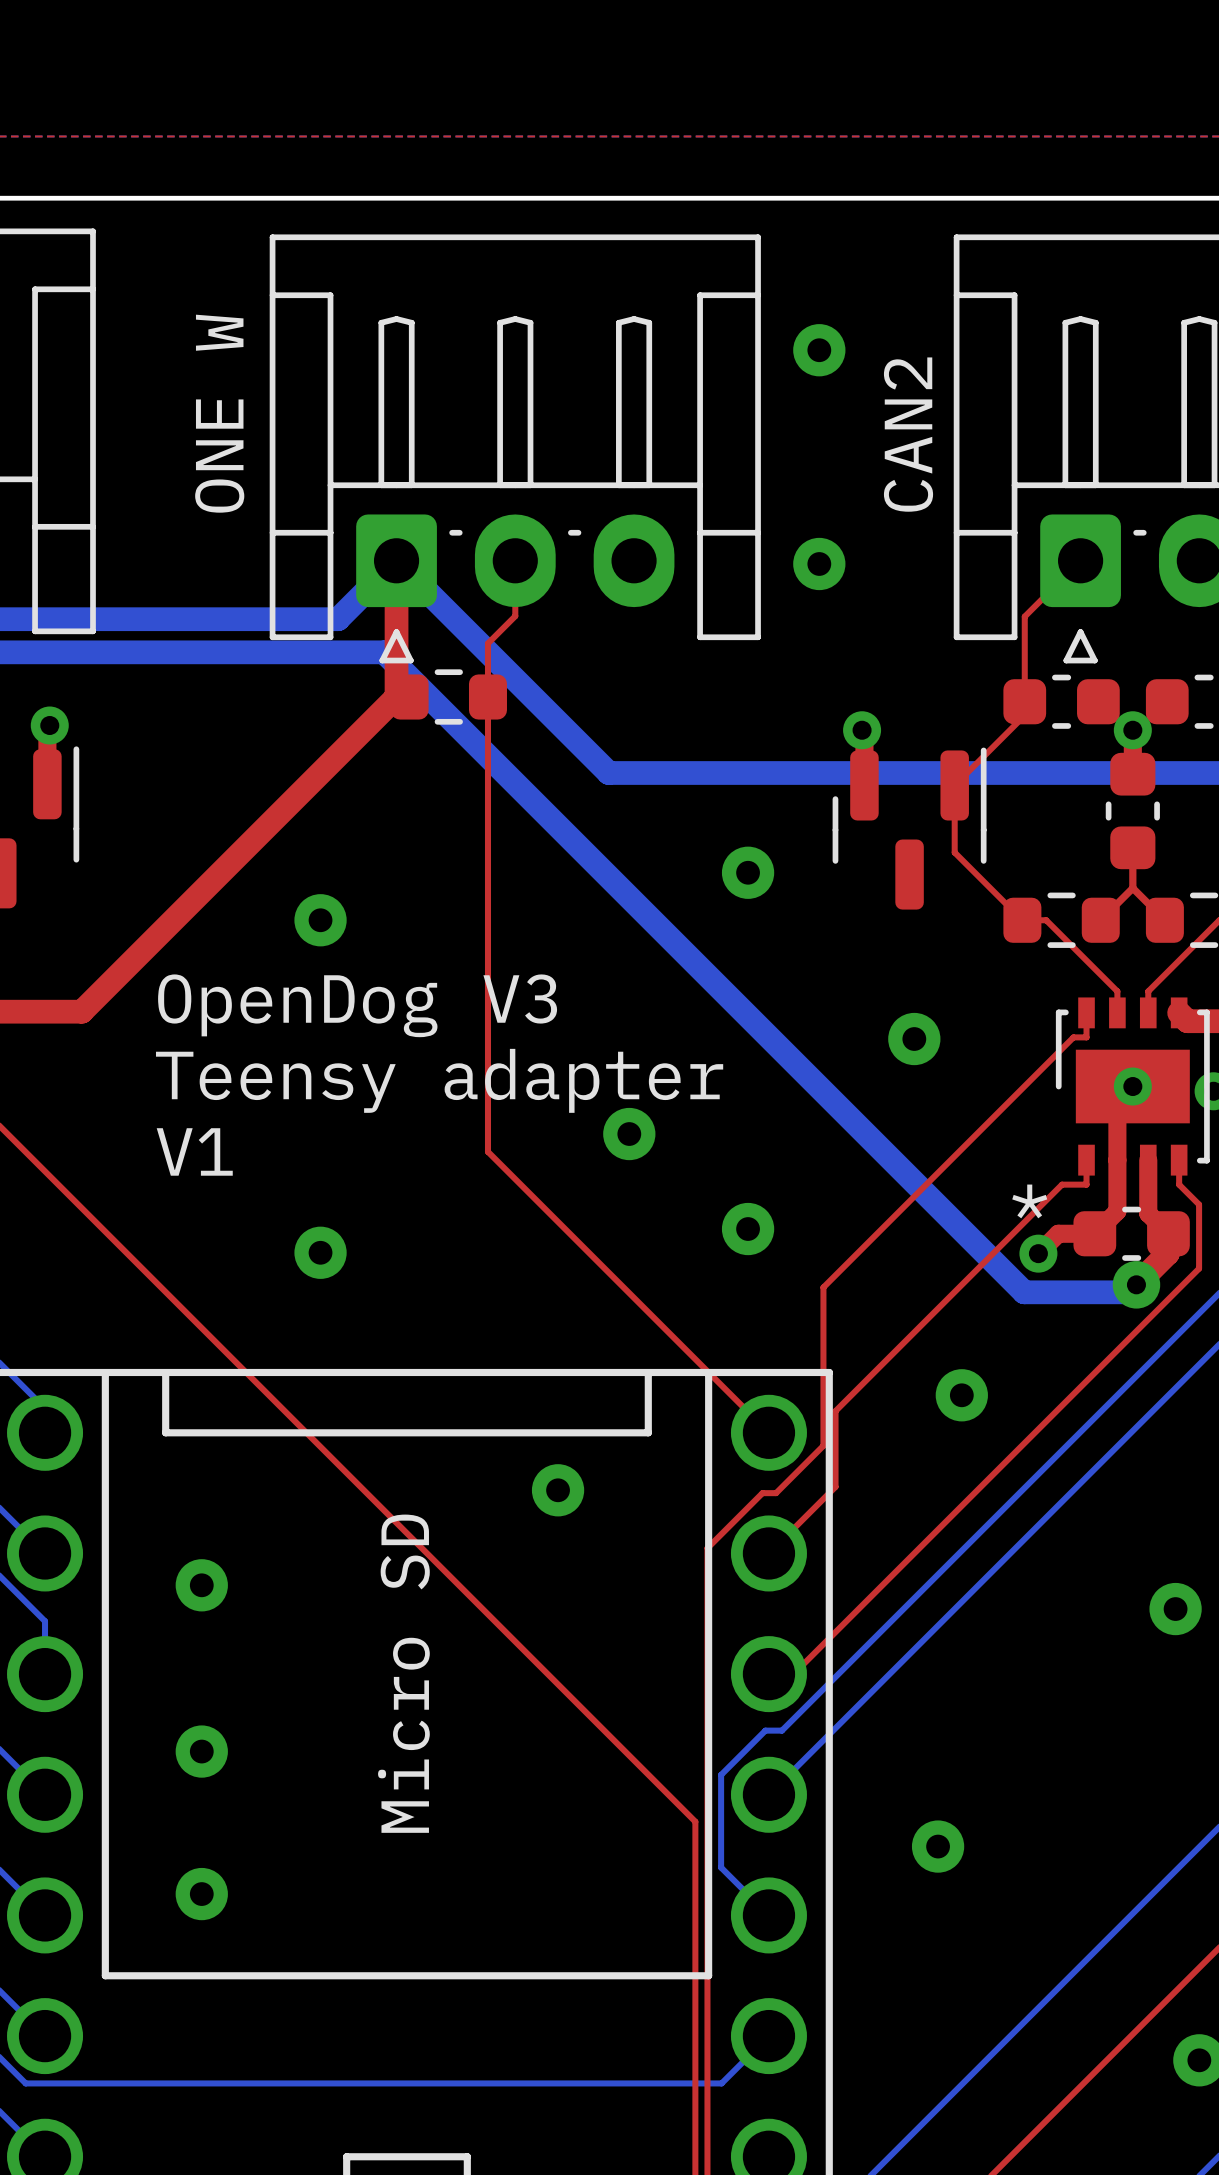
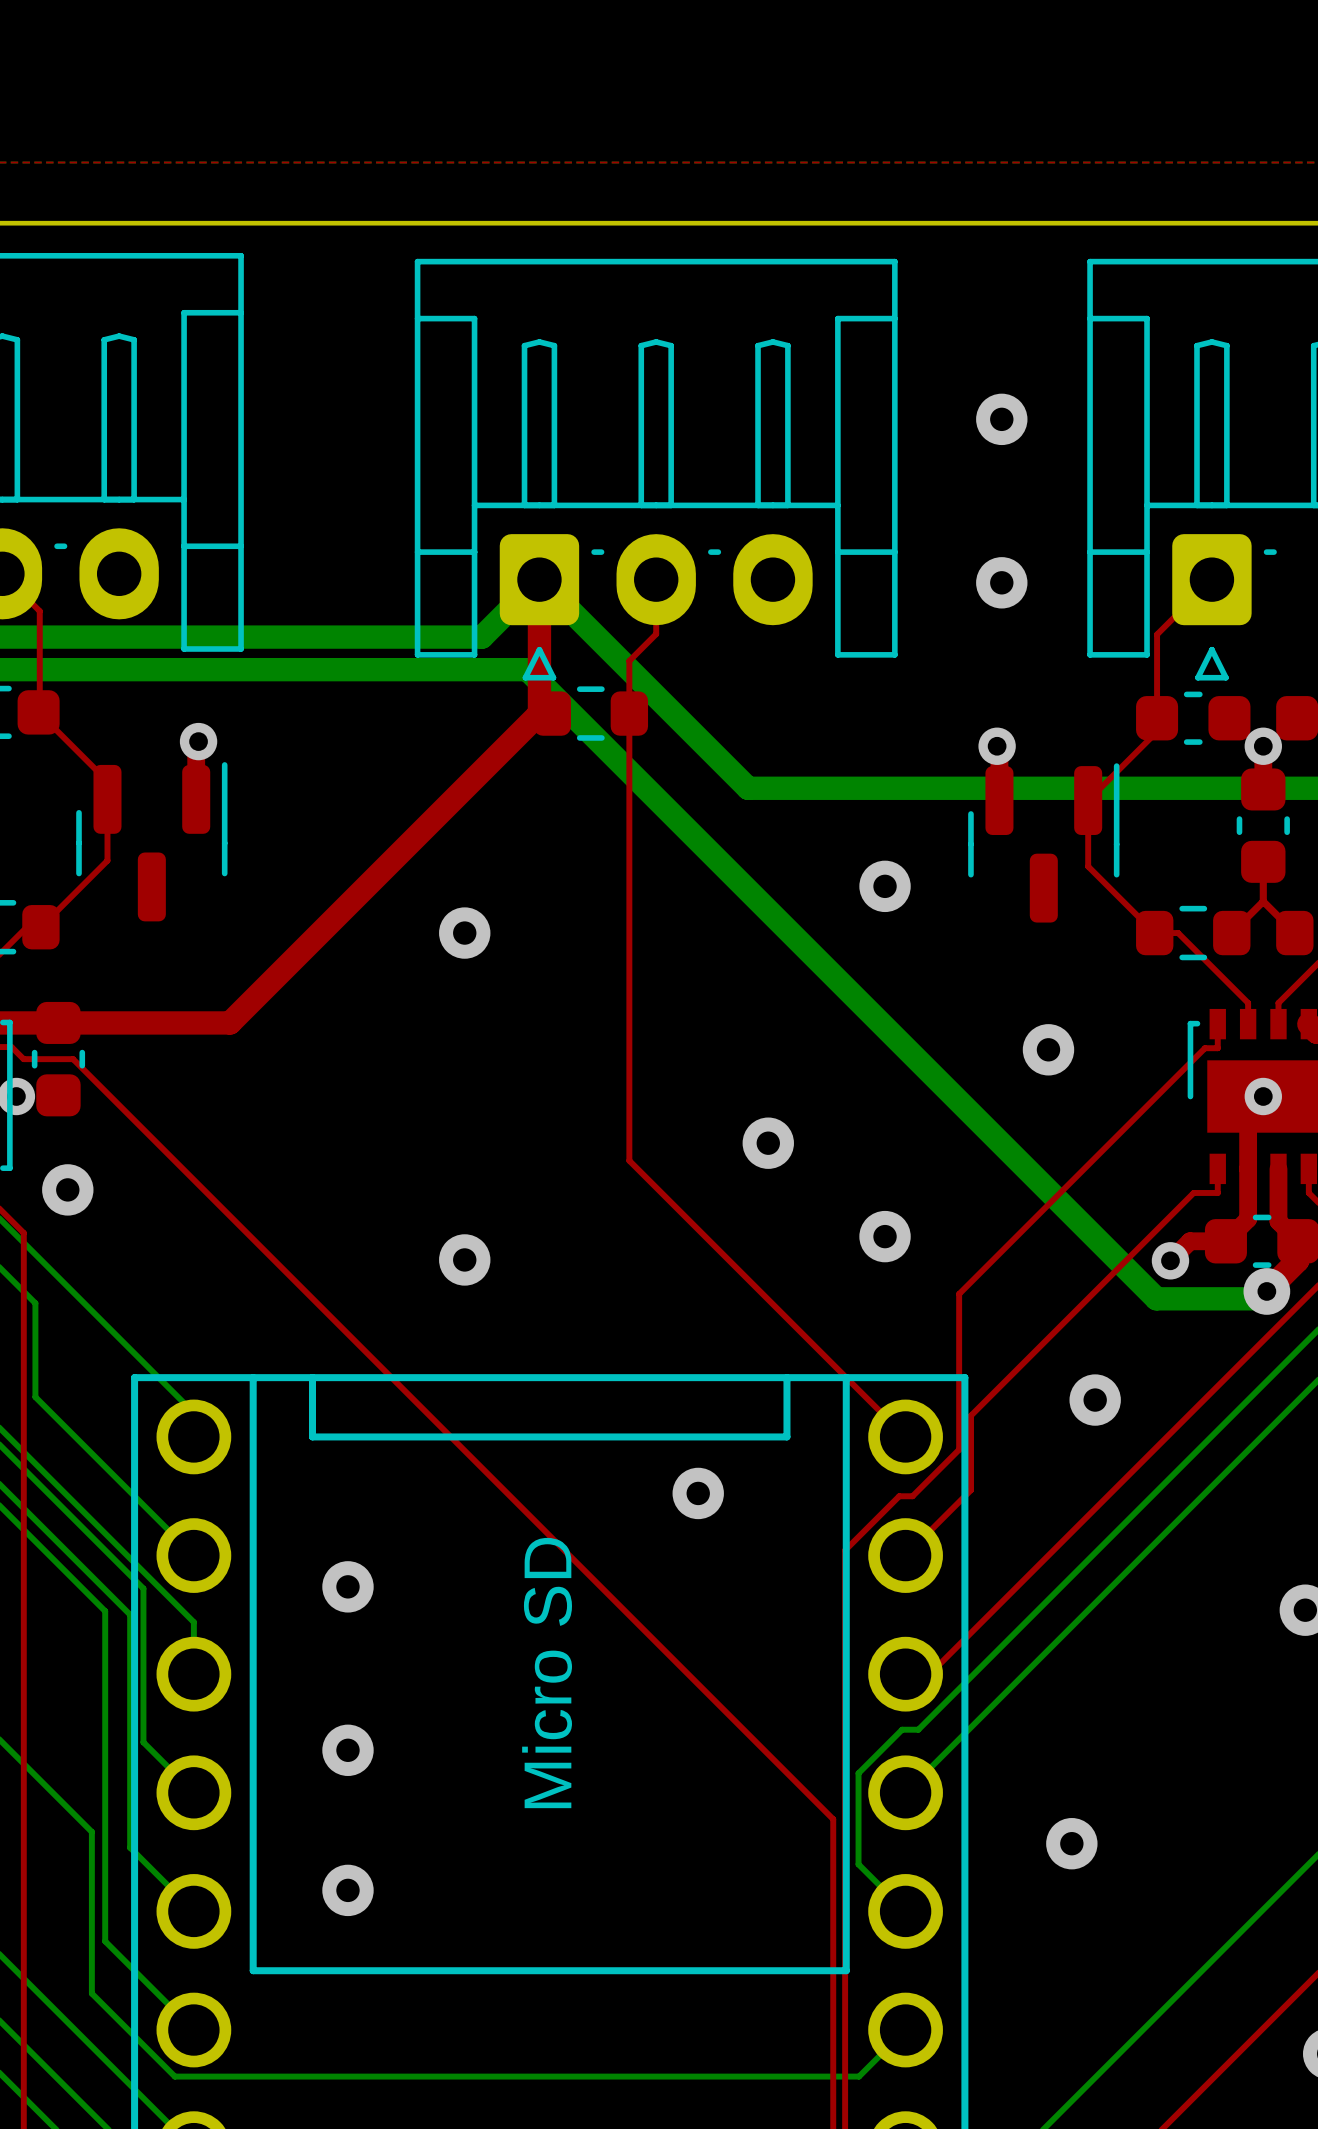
via position: (819, 350) -> (1001, 419)
text: ONE W (219, 413) -> none
text: CAN2 (908, 434) -> none
via position: (819, 563) -> (1001, 582)
text: OpenDog V3 (357, 1005) -> none
text: Teensy adapter (439, 1080) -> none
text: V1 (194, 1151) -> none
text: * (1029, 1201) -> none

